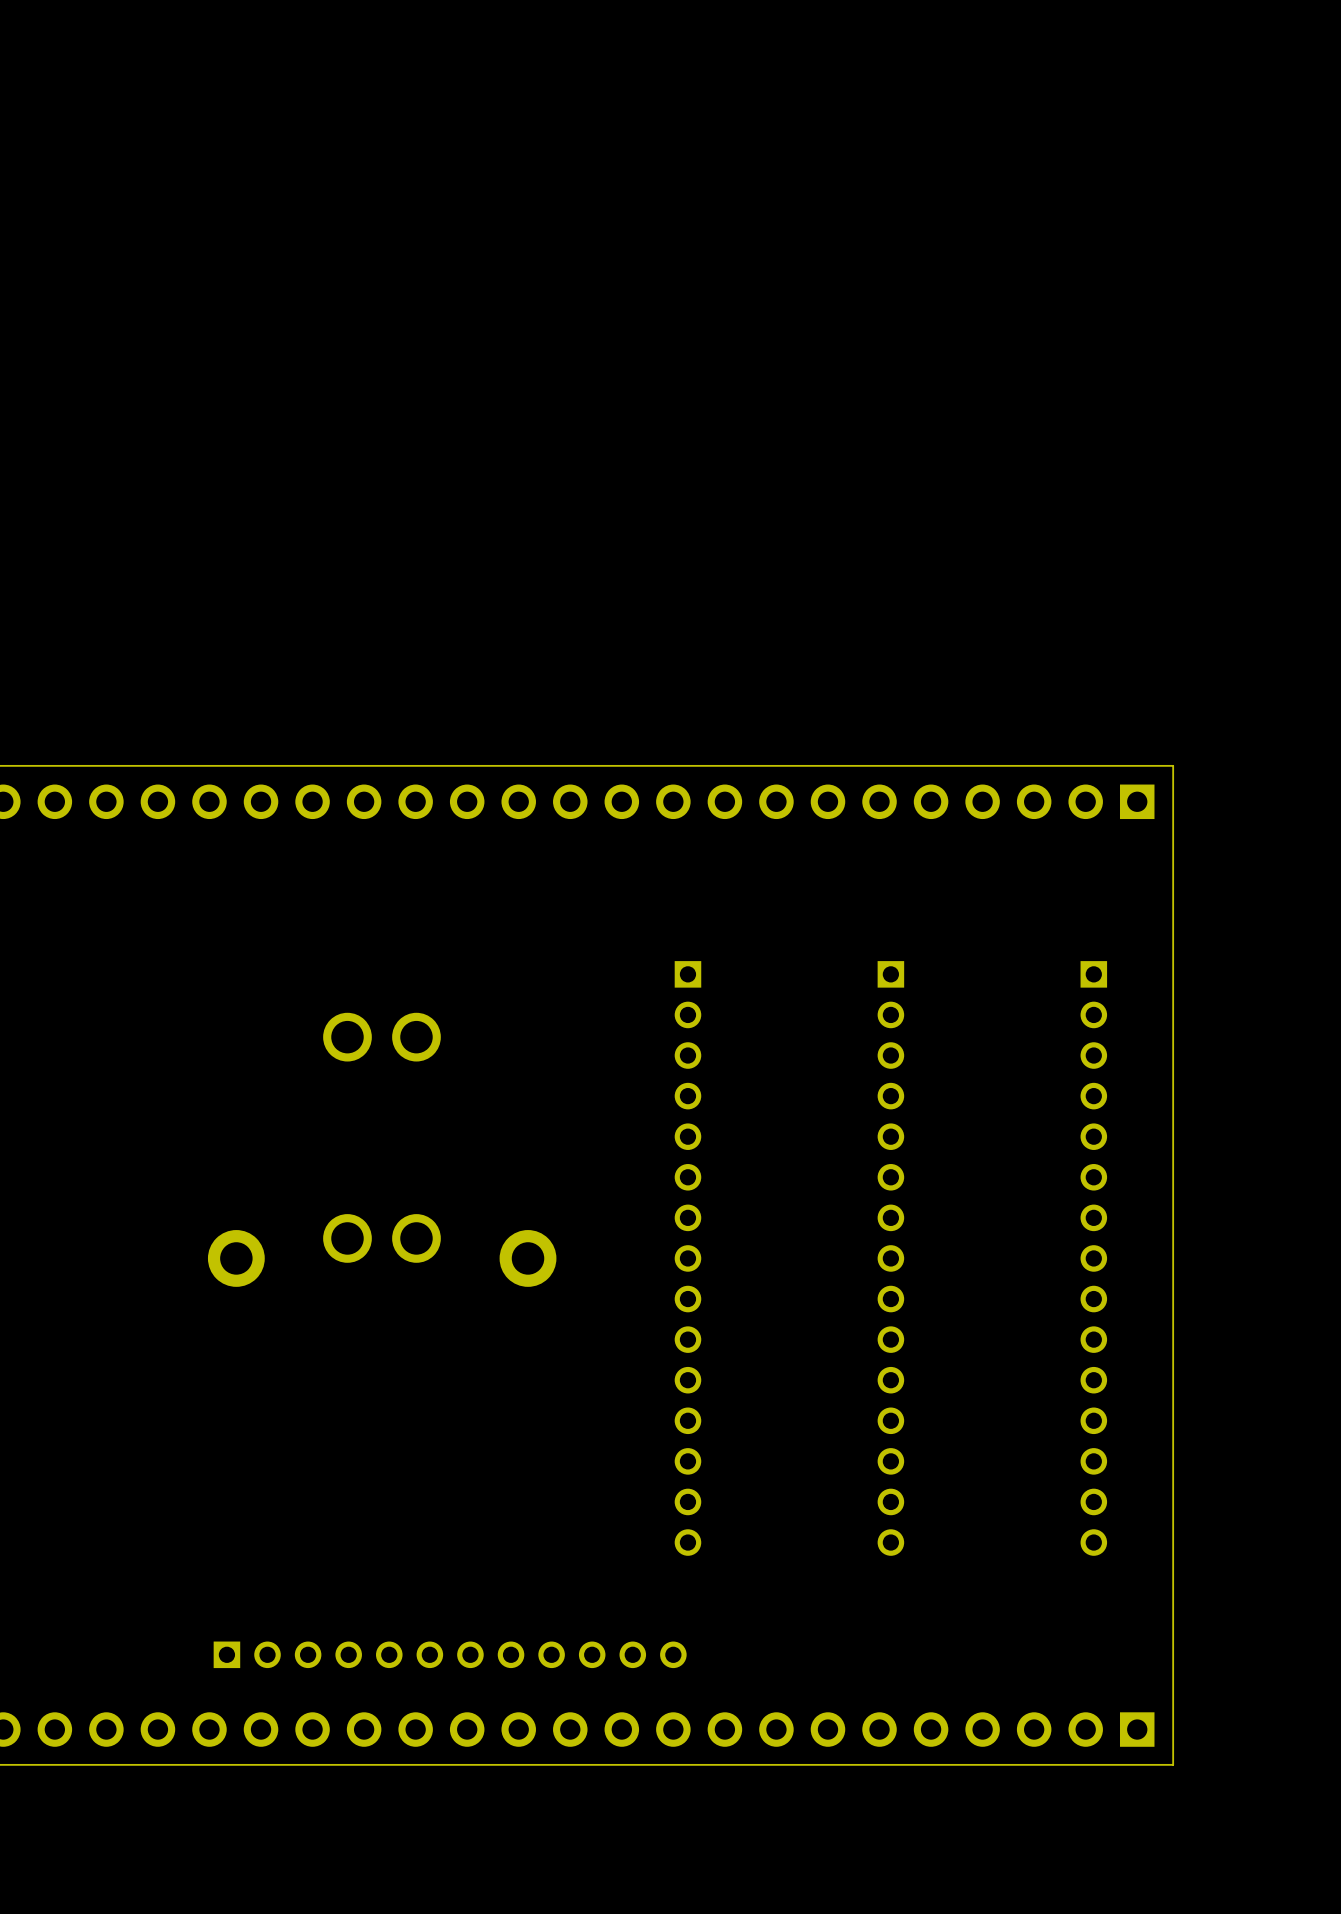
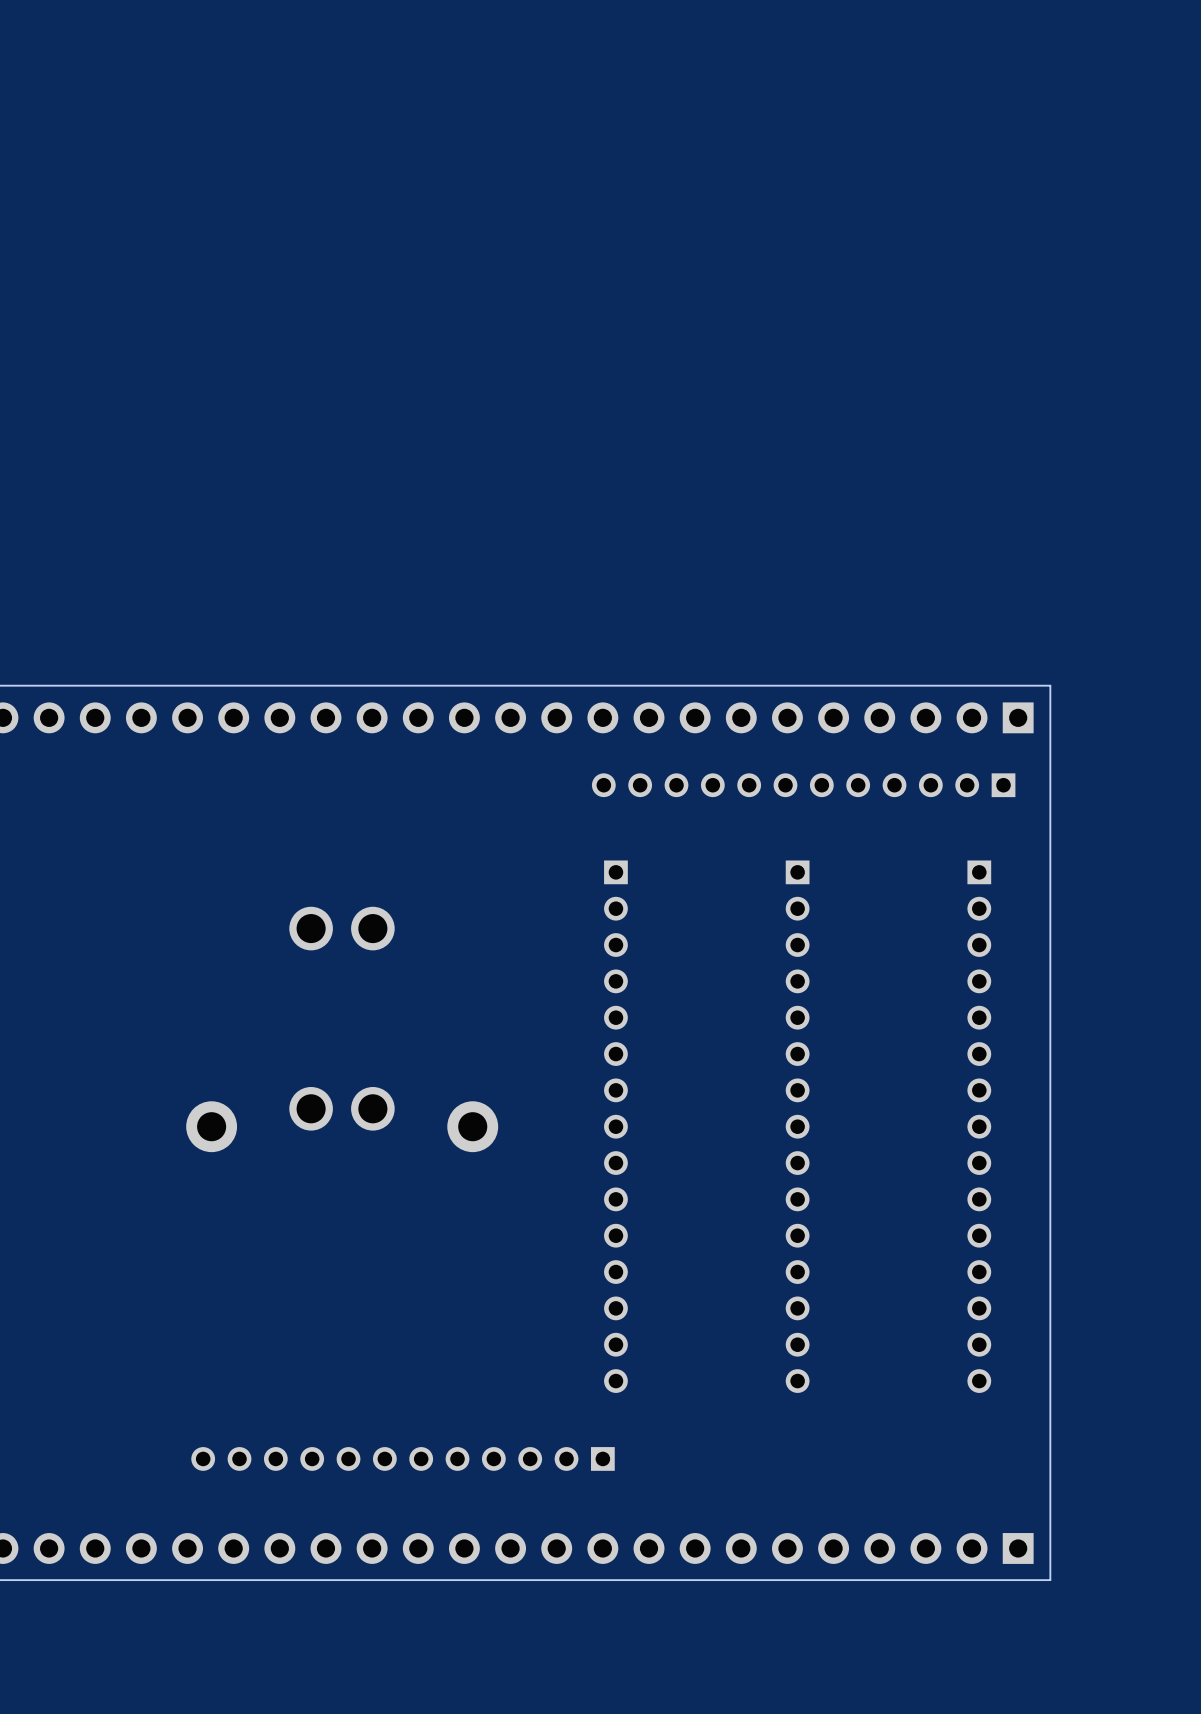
part: none -> (803, 785)
part rotation: 0° (450, 1654) -> 180° (403, 1458)

